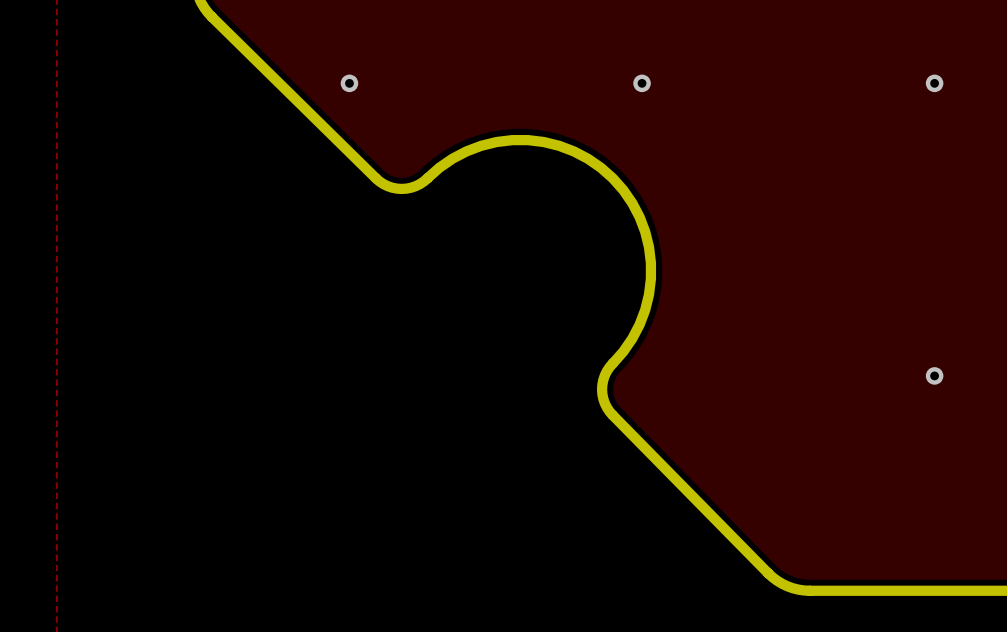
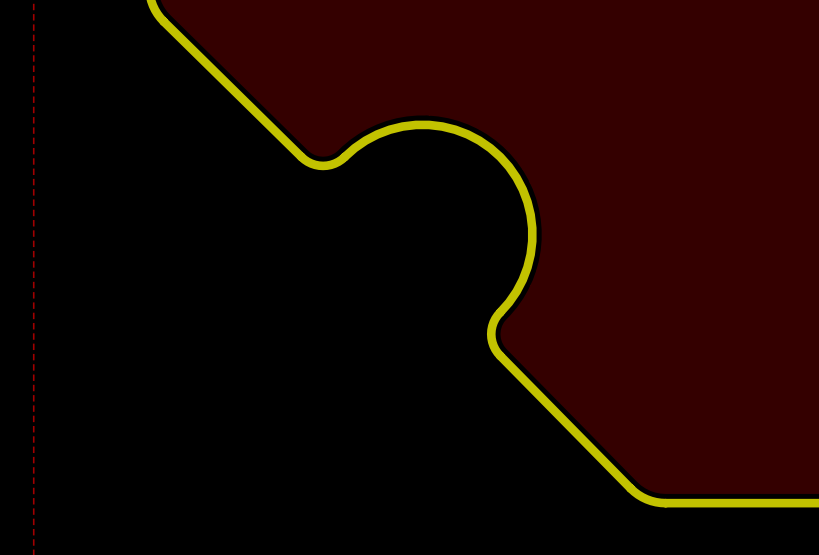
via: (349, 83) -> none
via: (642, 83) -> none
via: (934, 83) -> none
via: (934, 375) -> none

